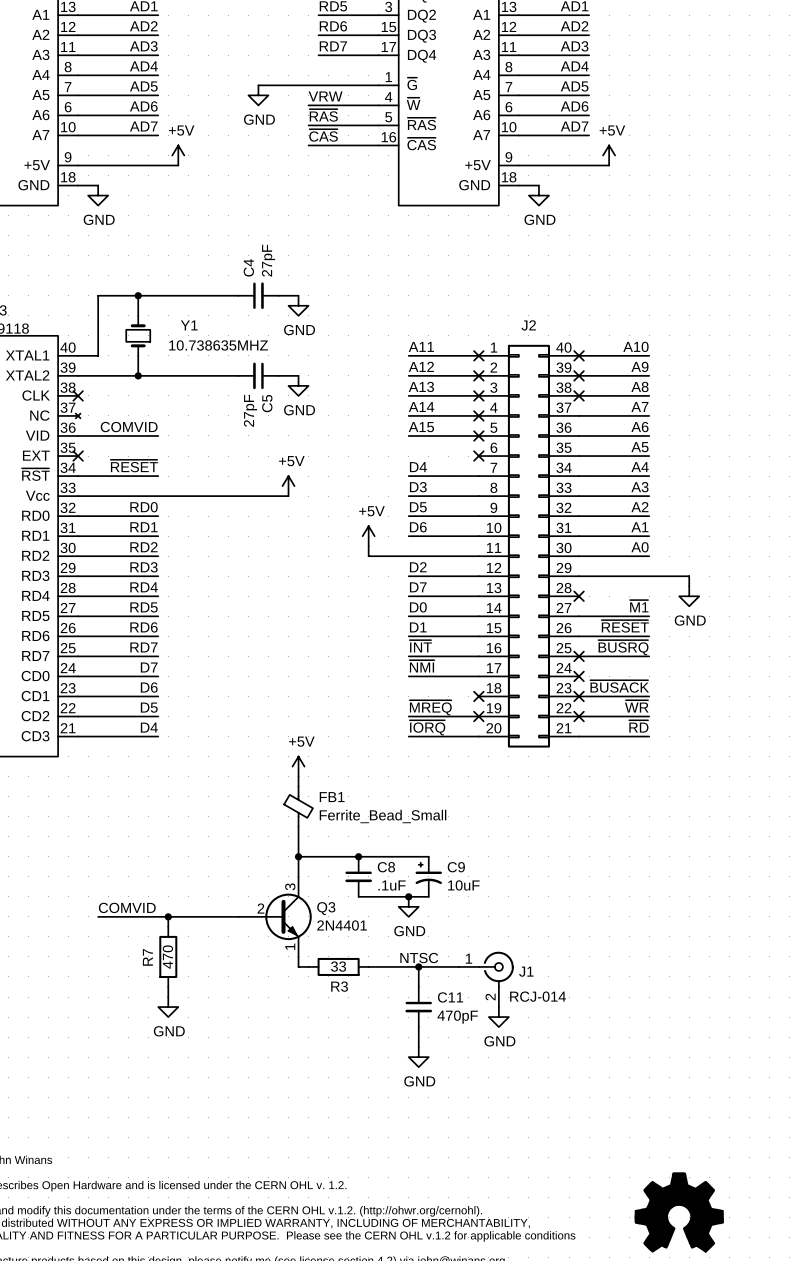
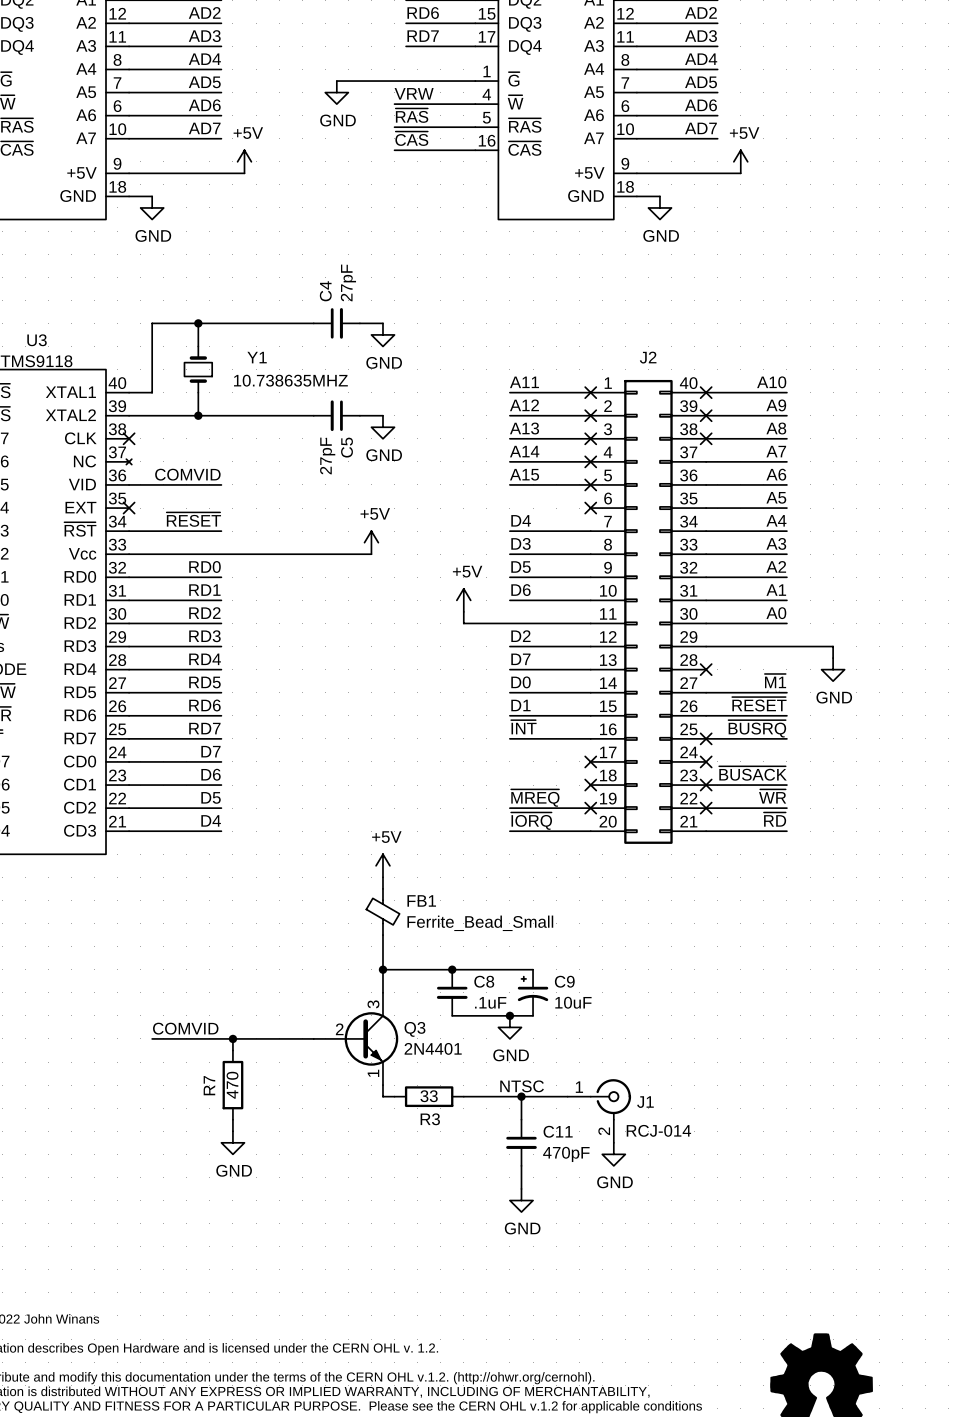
label: ~{NMI} (422, 666) -> none
wire: (408, 676) (478, 676) -> none
no-connect mark: none -> (590, 761)

